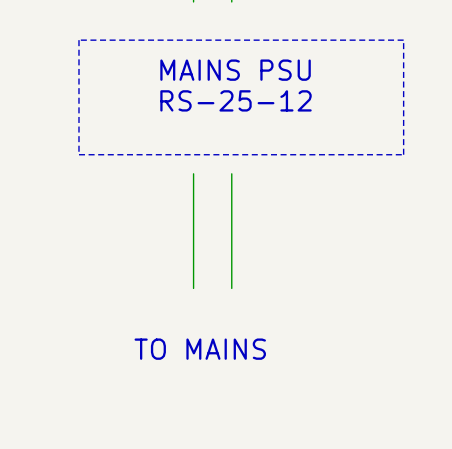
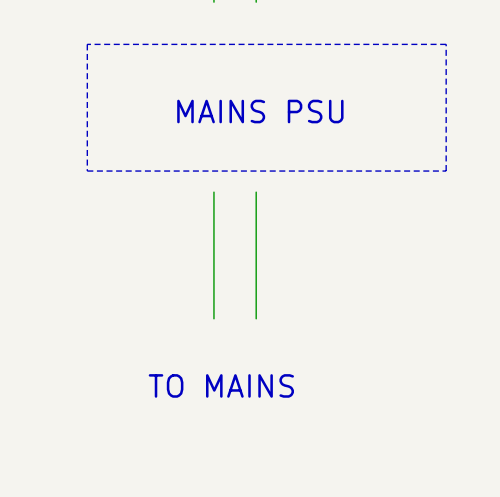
text: MAINS PSU (235, 70) -> none
text: RS-25-12 (236, 100) -> MAINS PSU (260, 111)

